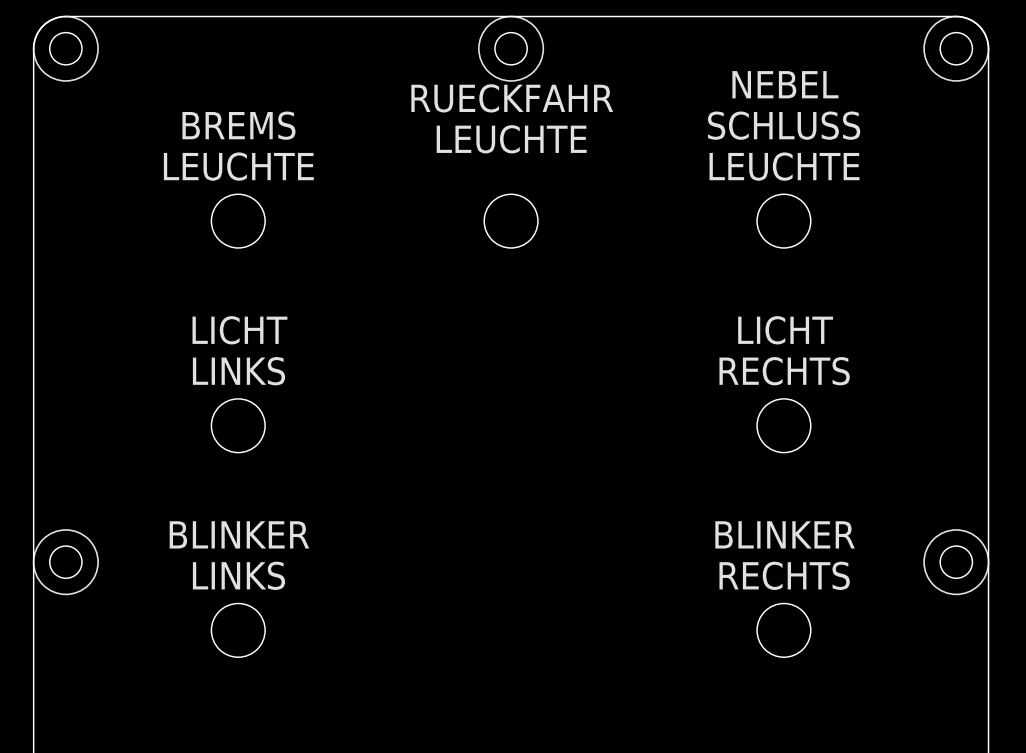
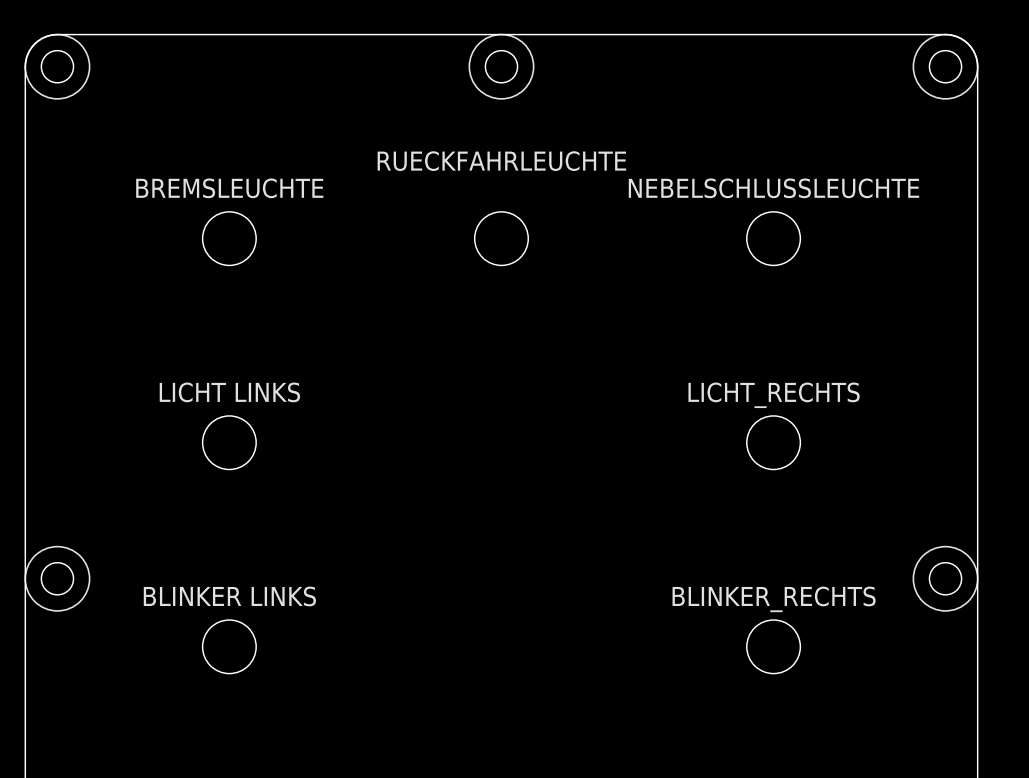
text: NEBEL (785, 84) -> none
text: RUECKFAHR (512, 98) -> none
text: BREMS (238, 125) -> none
text: SCHLUSS (784, 125) -> none
text: LEUCHTE (511, 139) -> RUECKFAHRLEUCHTE (501, 161)
text: LEUCHTE (238, 166) -> BREMSLEUCHTE (229, 188)
text: LEUCHTE (784, 166) -> NEBELSCHLUSSLEUCHTE (773, 188)
text: LICHT (239, 330) -> none
text: LICHT (785, 330) -> none
text: LINKS (238, 371) -> LICHT LINKS (229, 392)
text: RECHTS (784, 371) -> LICHT_RECHTS (774, 395)
text: BLINKER (239, 534) -> none
text: BLINKER (785, 534) -> none
text: LINKS (238, 575) -> BLINKER LINKS (229, 596)
text: RECHTS (784, 575) -> BLINKER_RECHTS (774, 599)

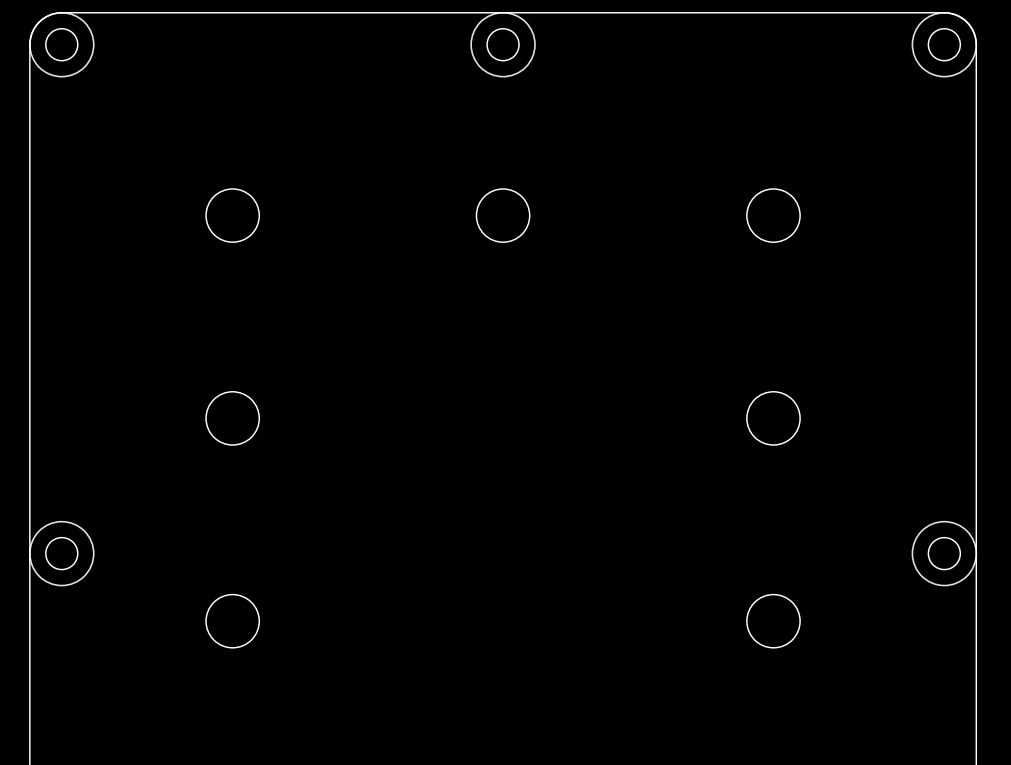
text: RUECKFAHRLEUCHTE (501, 161) -> none
text: BREMSLEUCHTE (229, 188) -> none
text: NEBELSCHLUSSLEUCHTE (773, 188) -> none
text: LICHT LINKS (229, 392) -> none
text: LICHT_RECHTS (774, 395) -> none
text: BLINKER LINKS (229, 596) -> none
text: BLINKER_RECHTS (774, 599) -> none

